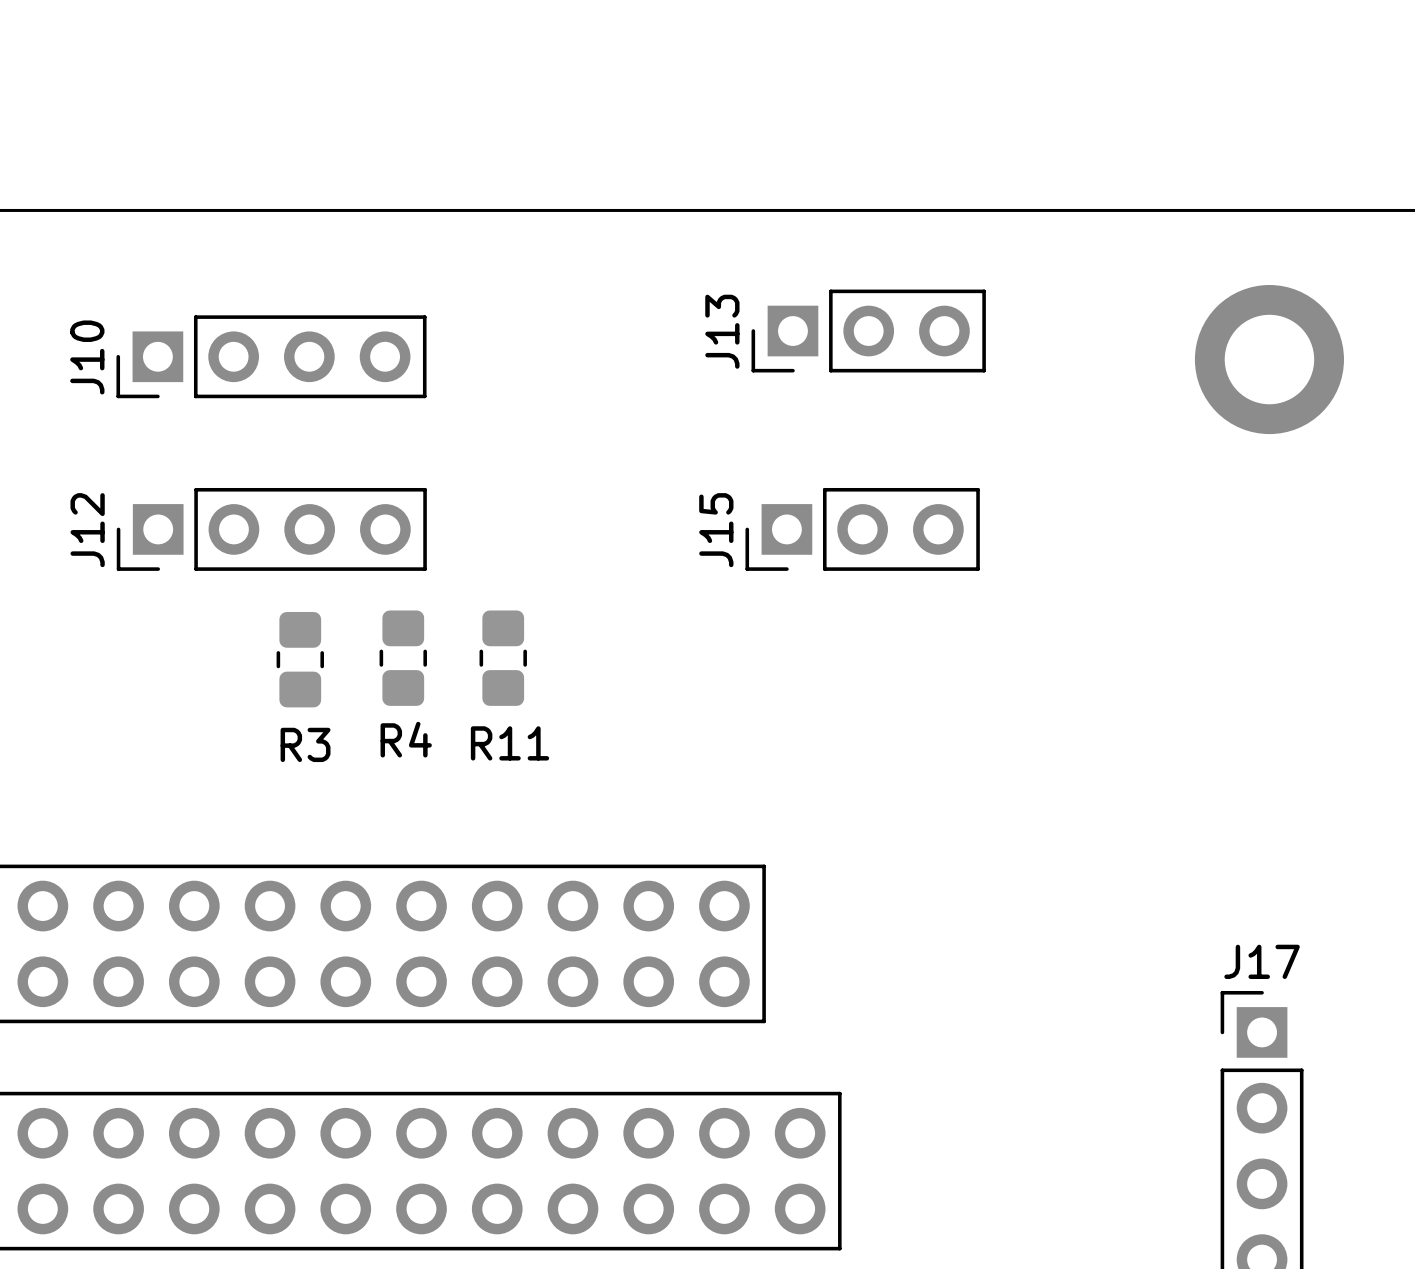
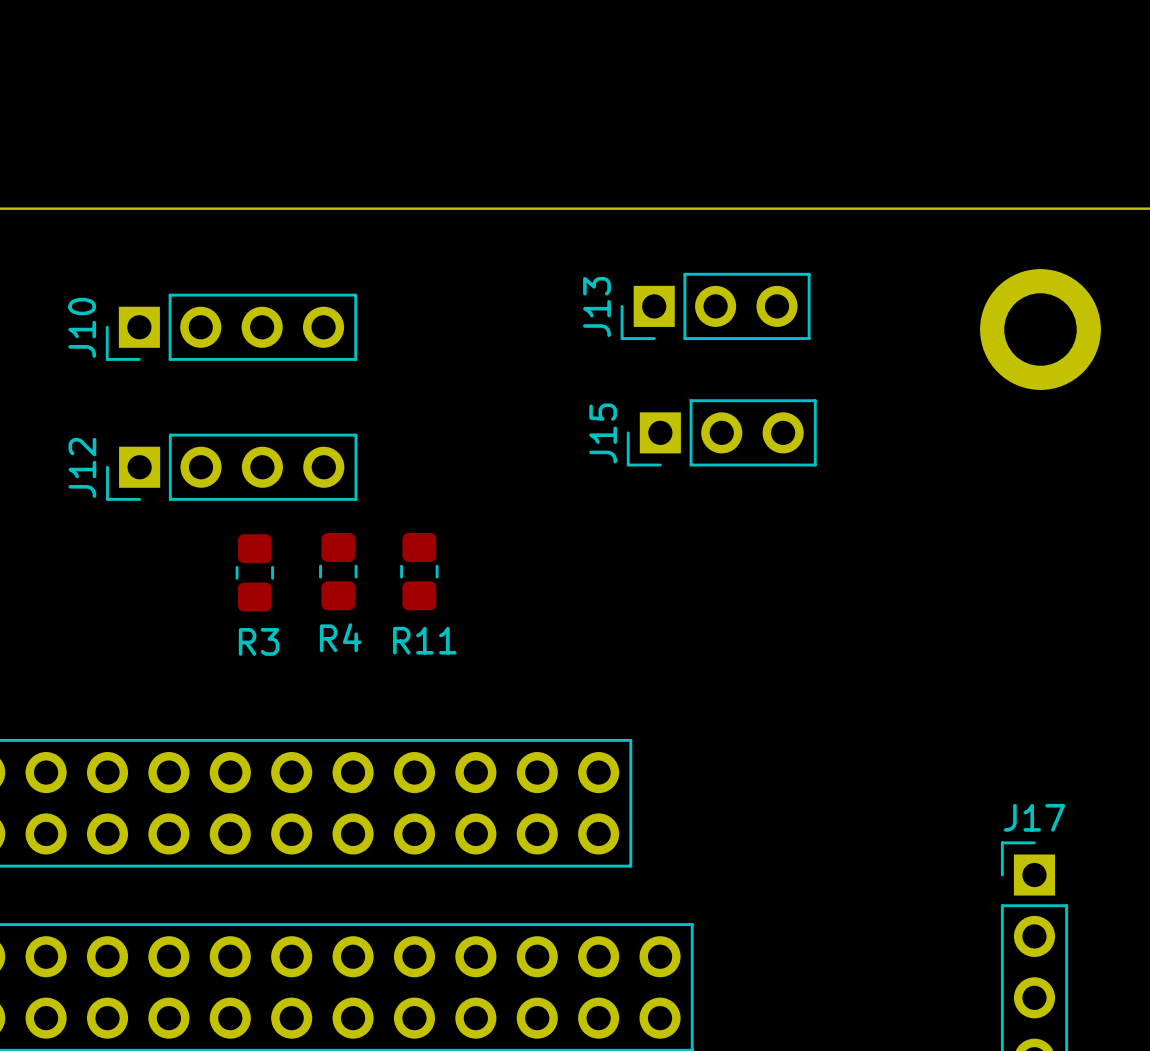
J15 position: (862, 529) -> (721, 432)

